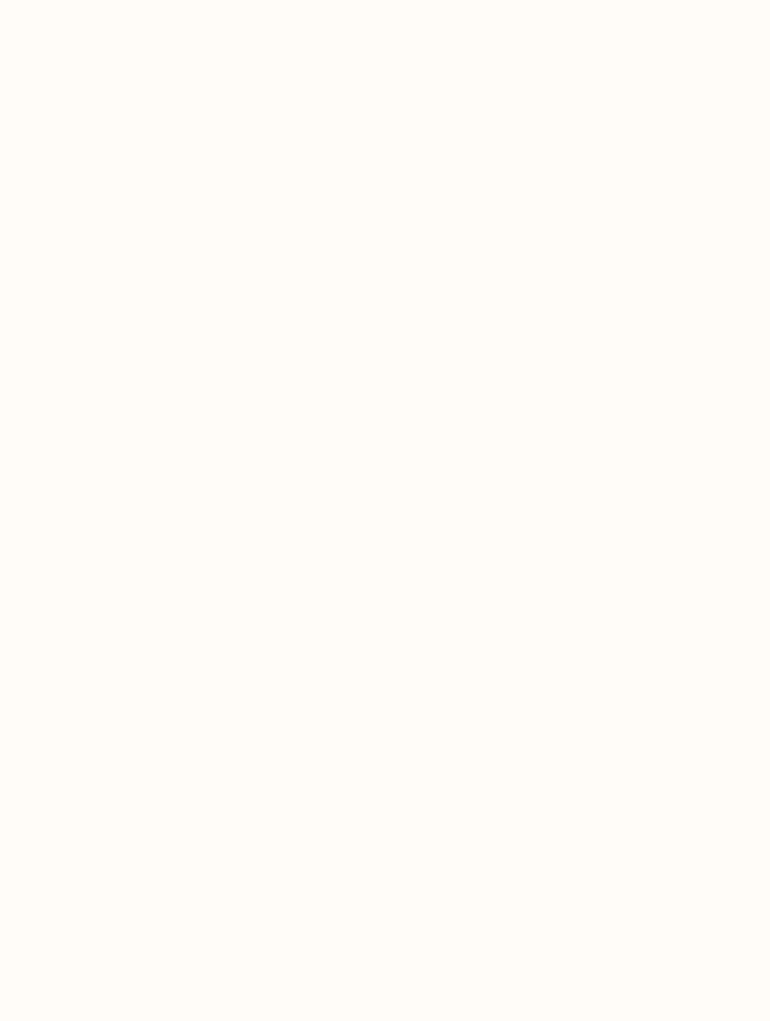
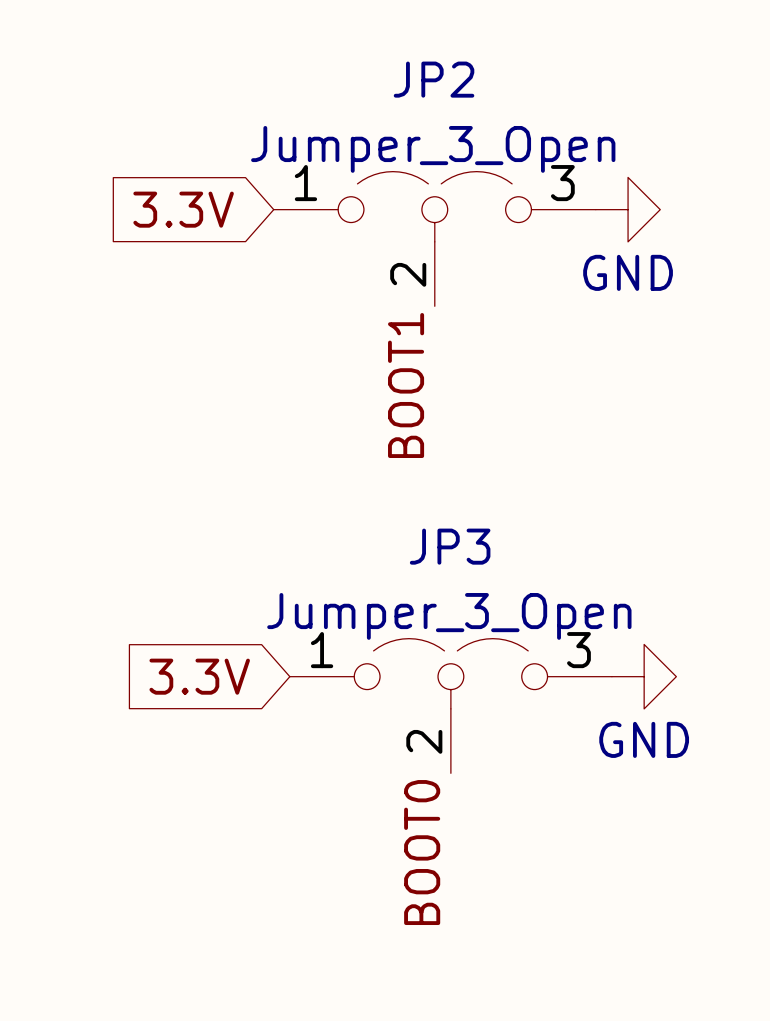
global label: none -> 3.3V (183, 209)
power symbol: none -> GND (628, 209)
JP2: none -> Jumper_3_Open (434, 238)
label: none -> BOOT1 (406, 385)
global label: none -> 3.3V (199, 676)
power symbol: none -> GND (644, 676)
JP3: none -> Jumper_3_Open (450, 705)
label: none -> BOOT0 (422, 852)

